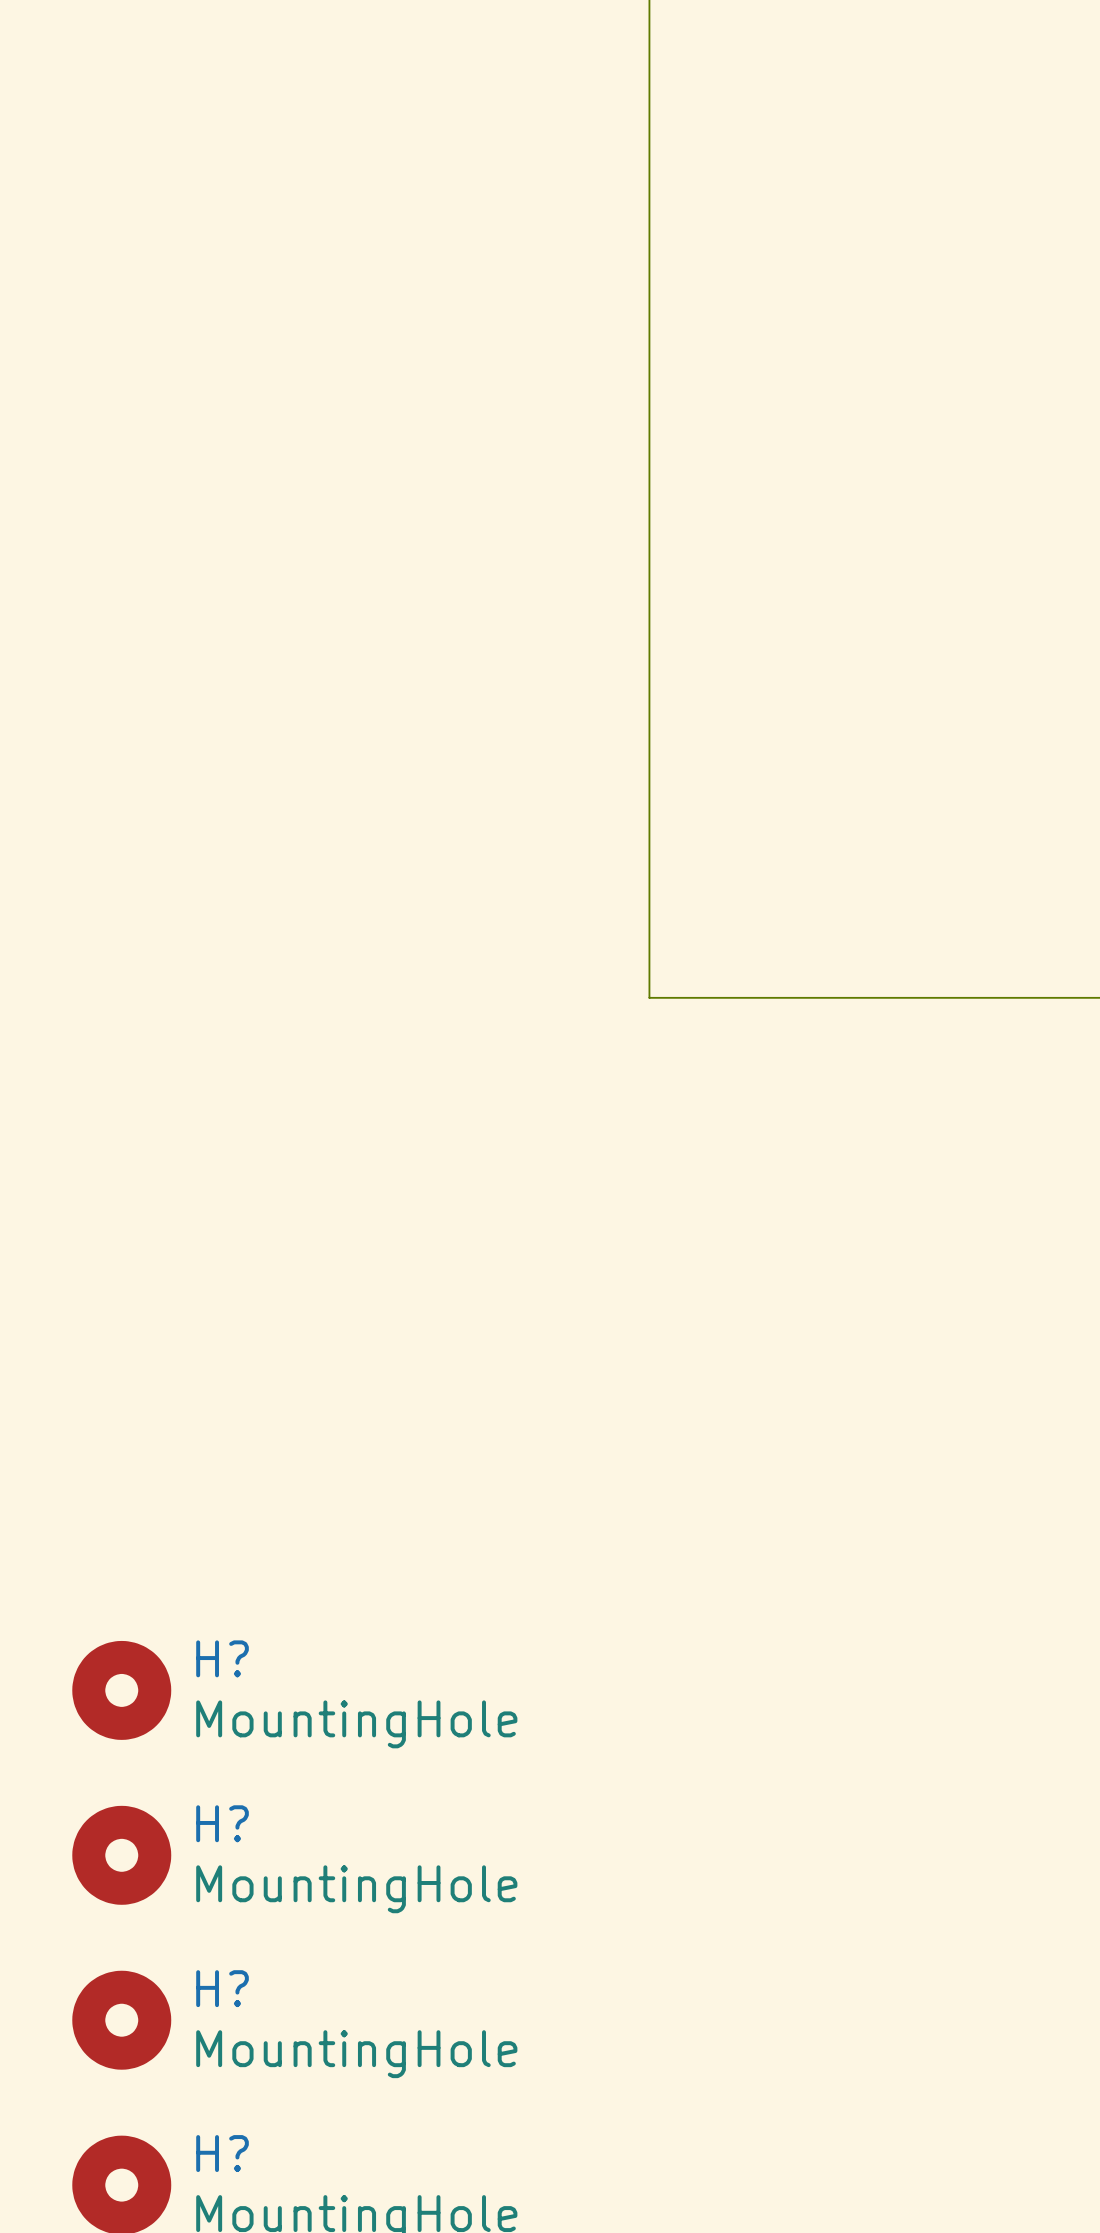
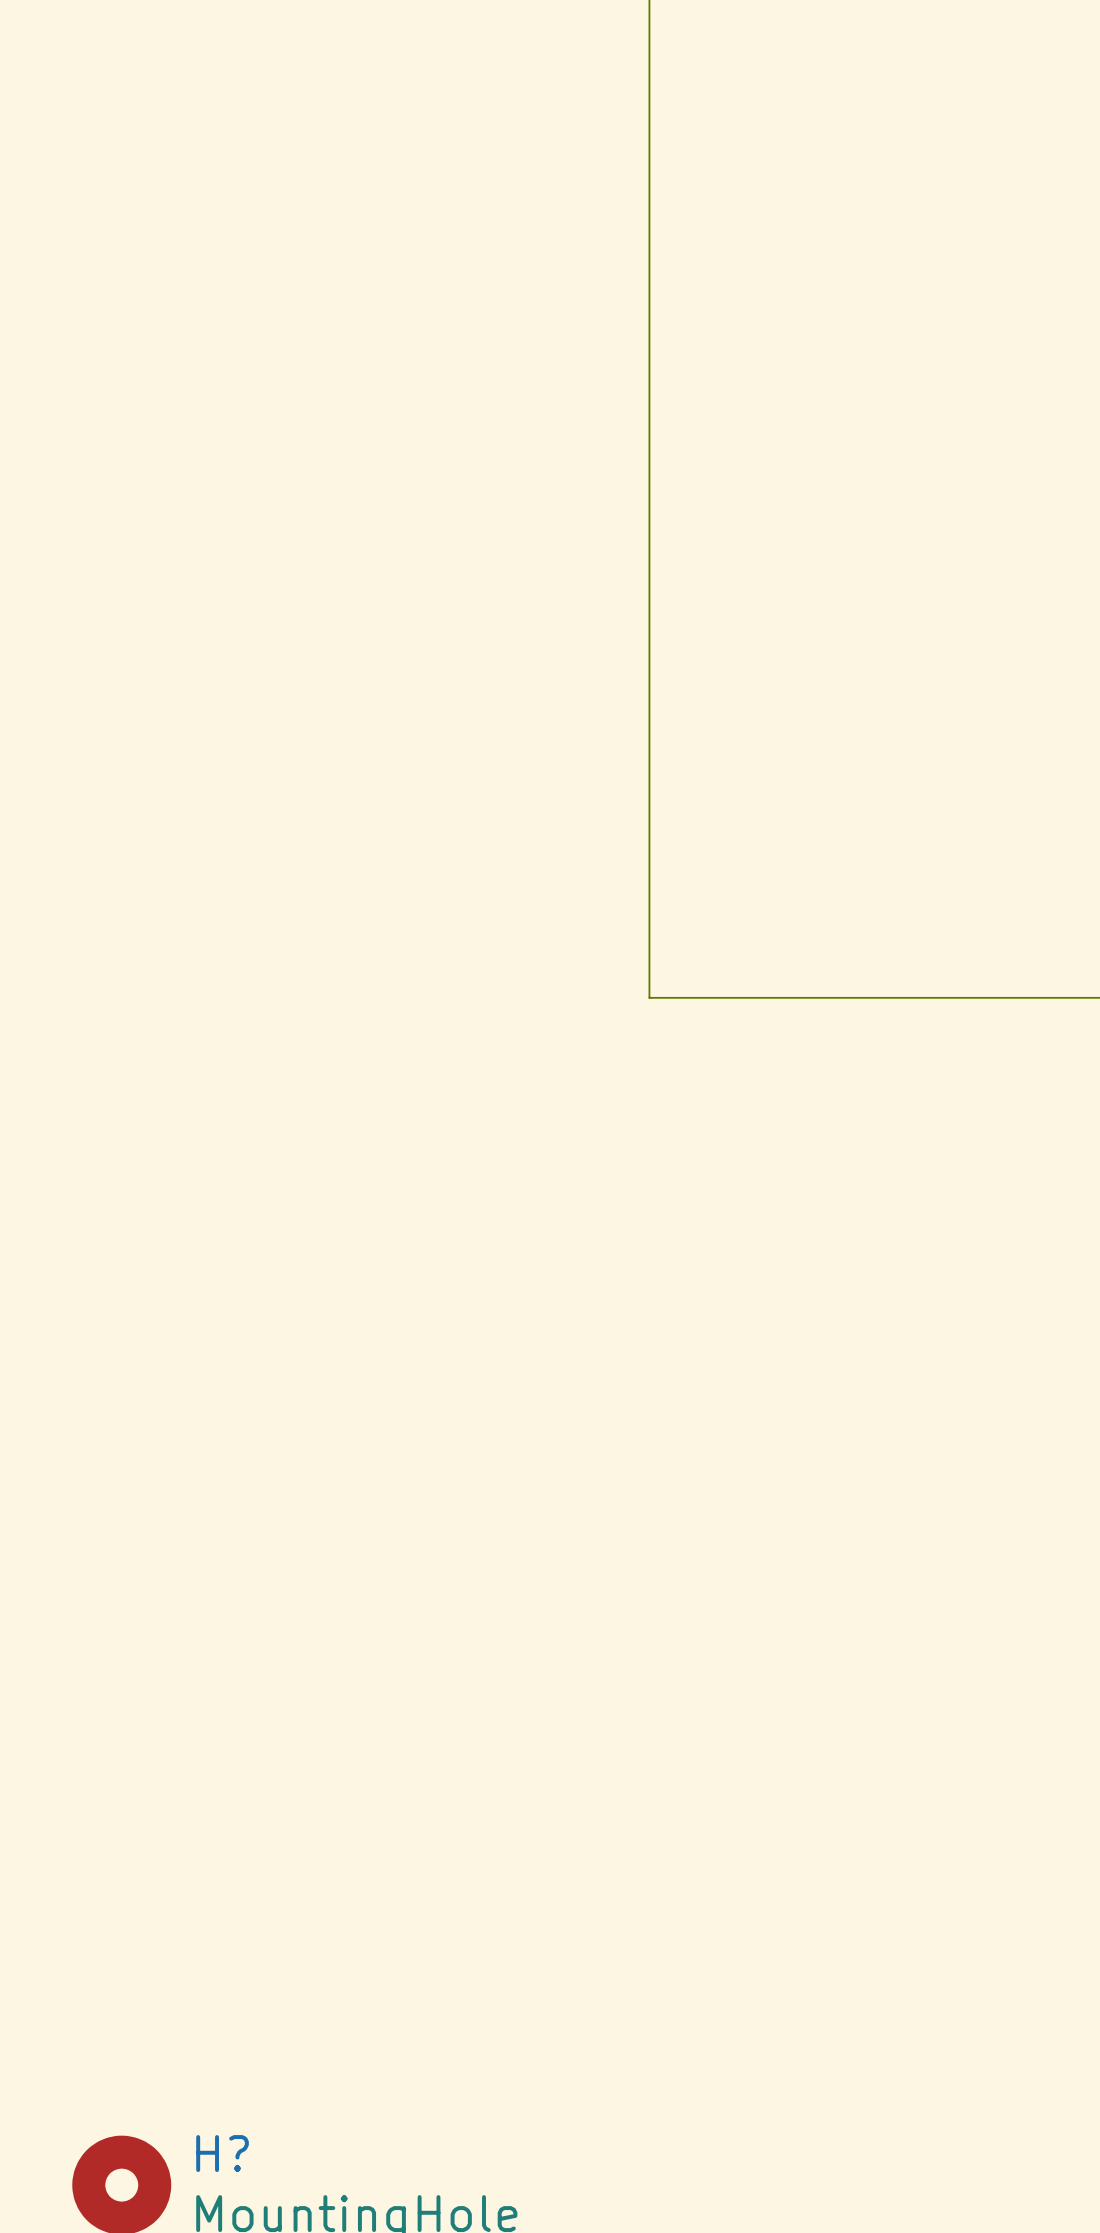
H?: MountingHole (121, 1690) -> none
H?: MountingHole (121, 1855) -> none
H?: MountingHole (121, 2020) -> none

